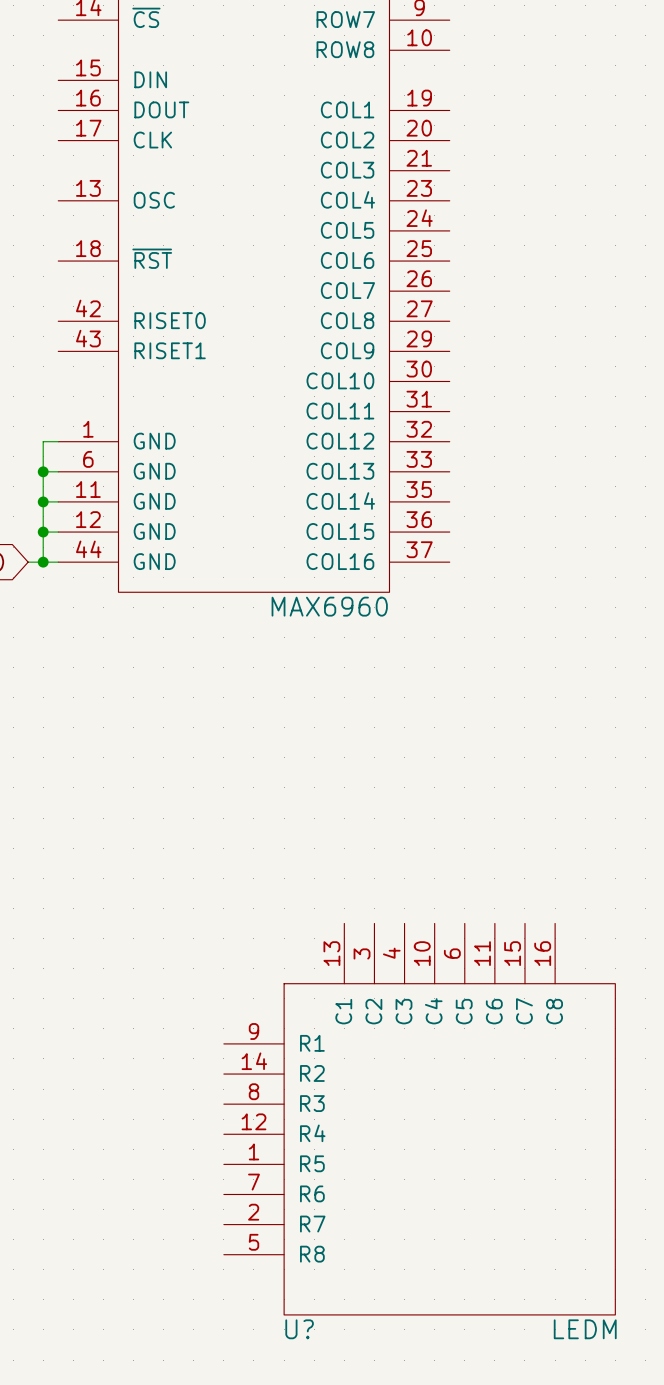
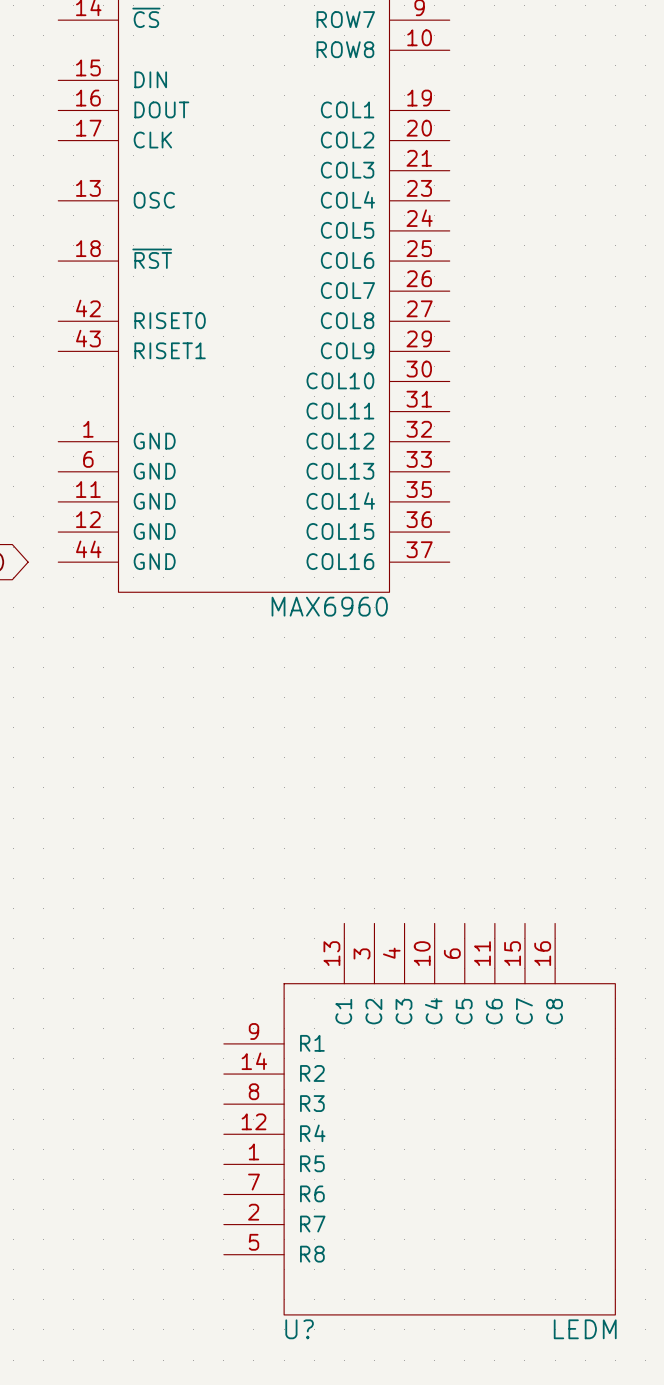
wire: (58, 441) (43, 441) (43, 562) -> none
wire: (43, 471) (58, 471) -> none
junction: (43, 471) -> none
wire: (43, 501) (58, 501) -> none
junction: (43, 501) -> none
wire: (43, 532) (58, 532) -> none
junction: (43, 532) -> none
wire: (28, 562) (58, 562) -> none
junction: (43, 562) -> none

